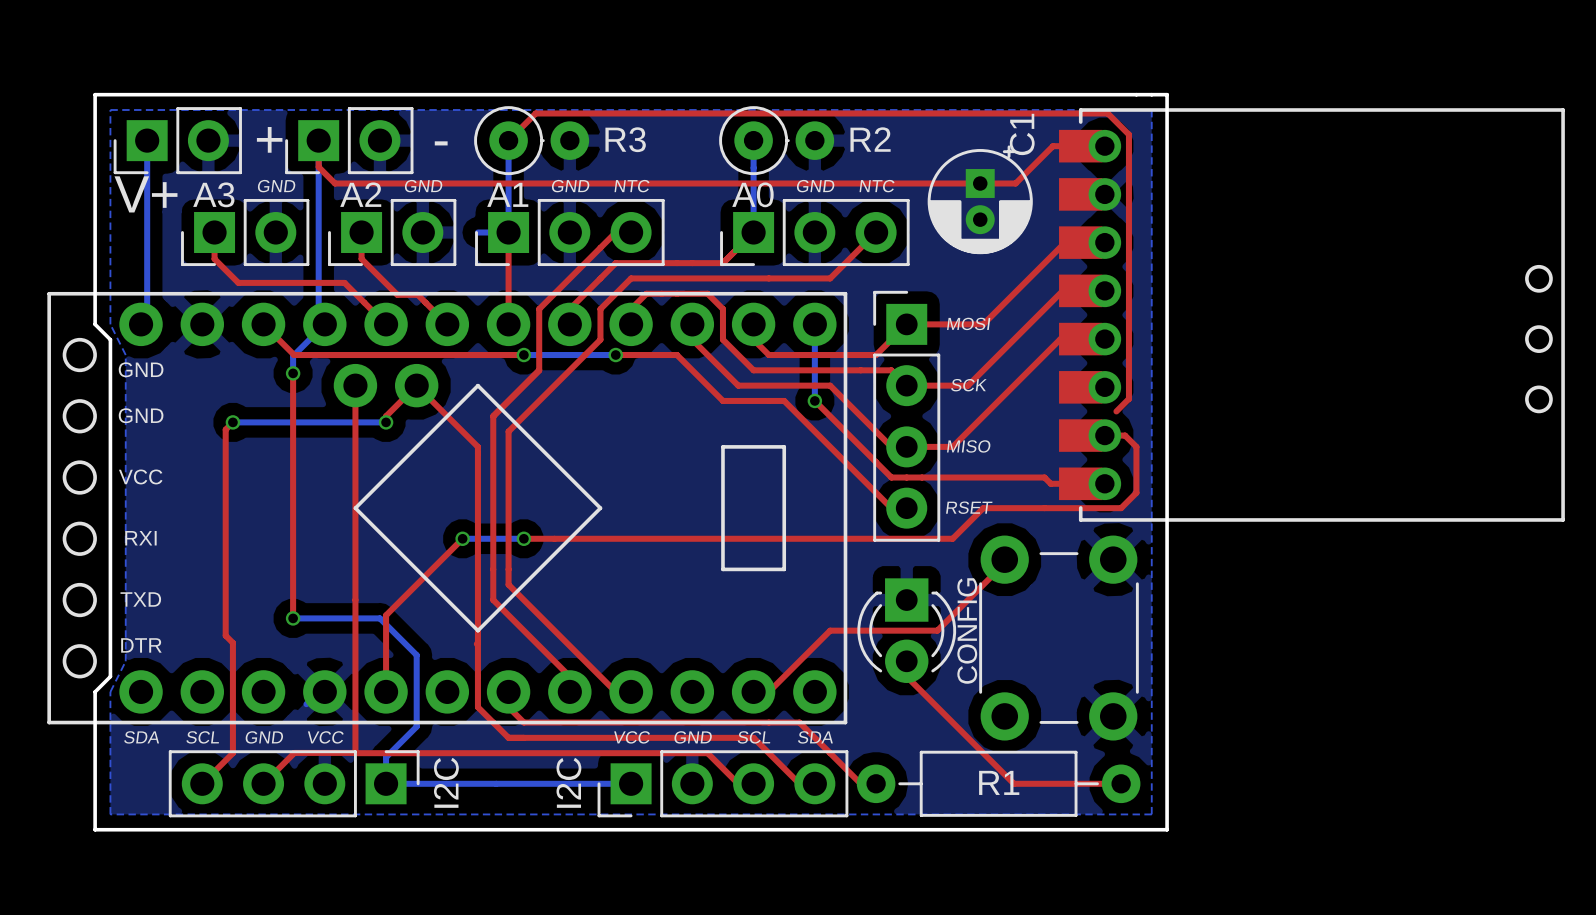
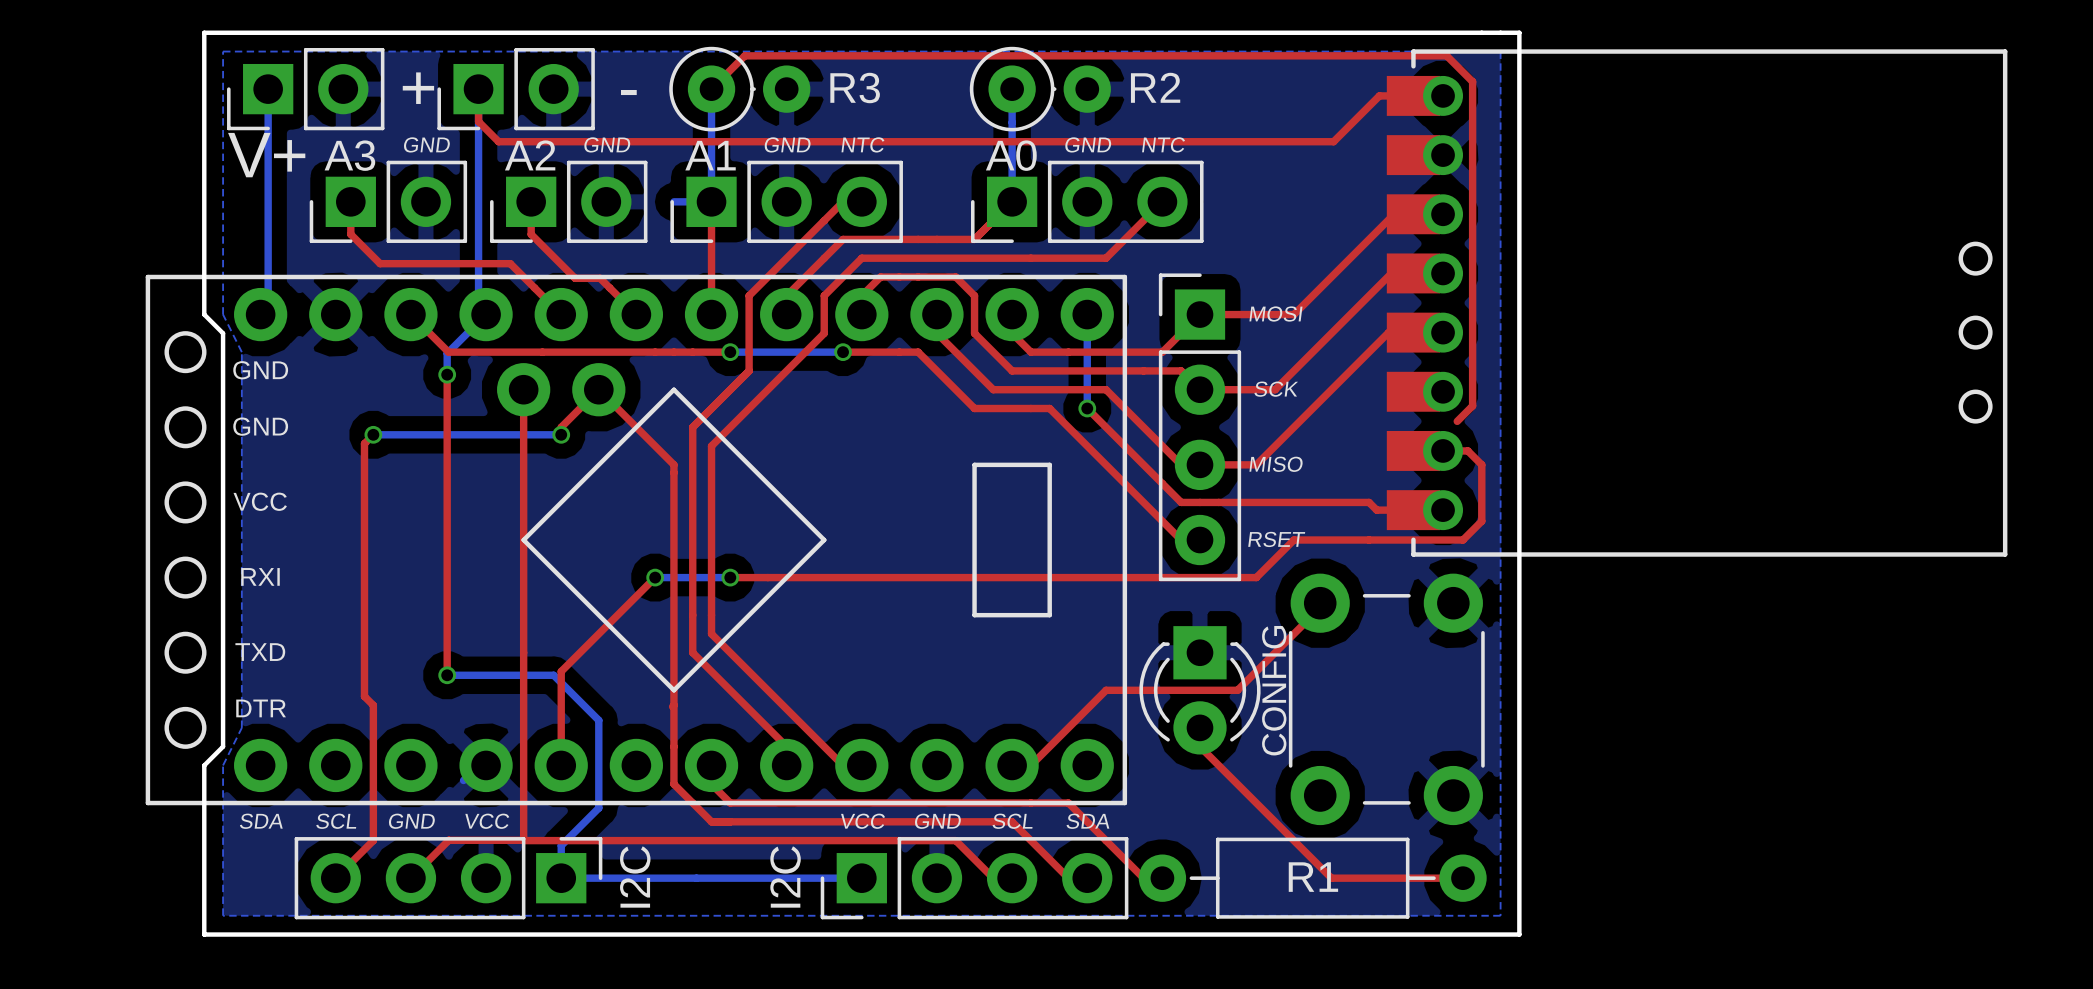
C1: (980, 199) -> none

